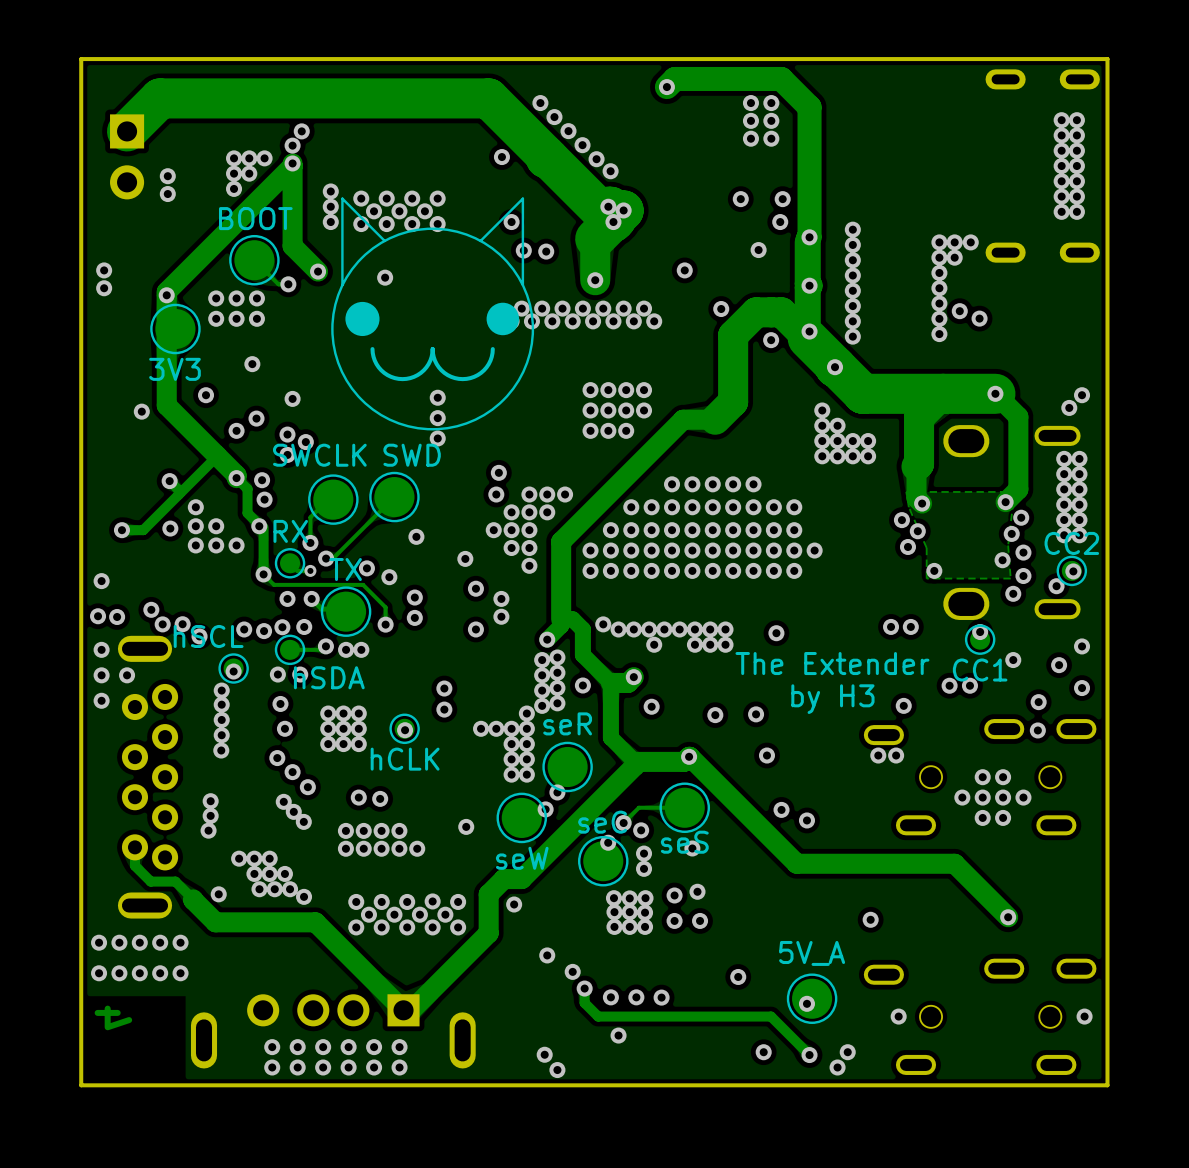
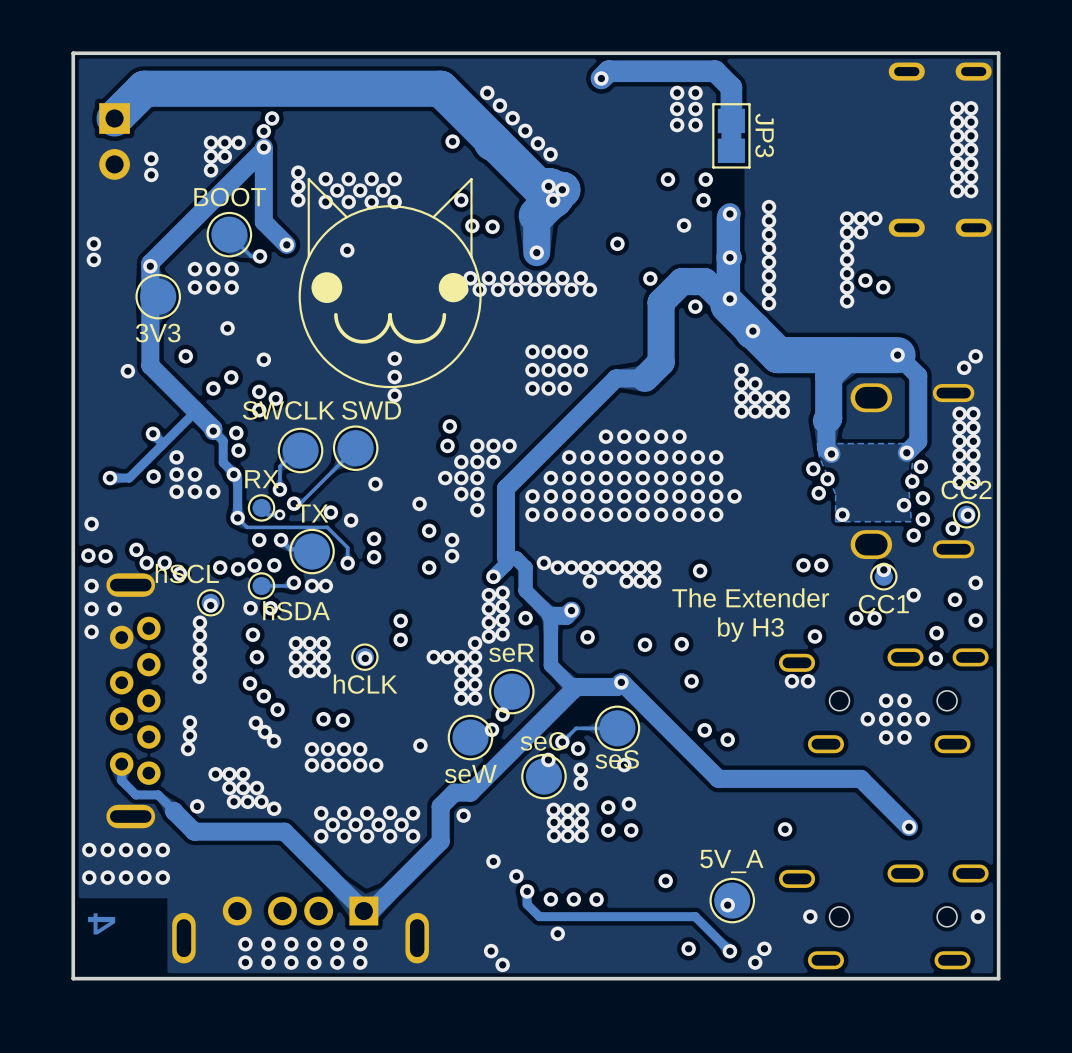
track: (781, 78) (809, 107) (809, 237) -> (704, 71) (715, 71) (731, 87) (731, 120)
JP3: none -> (731, 135)

